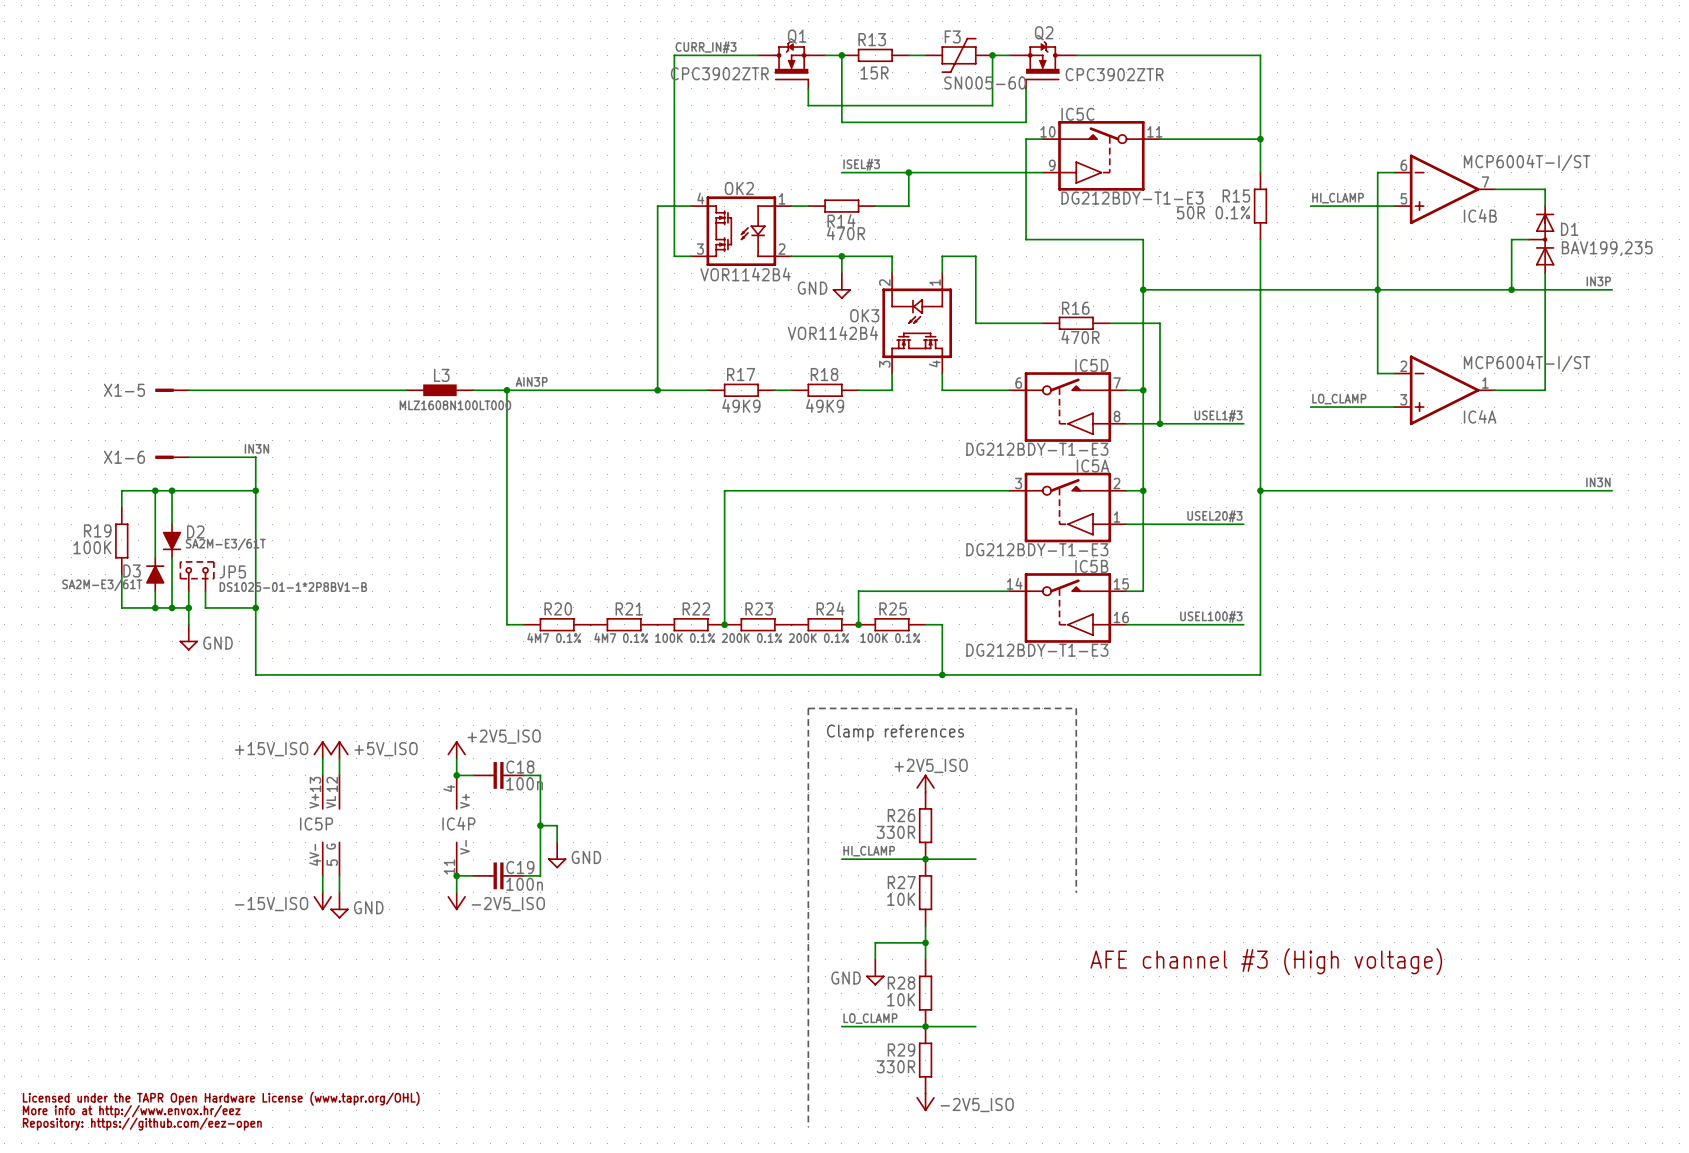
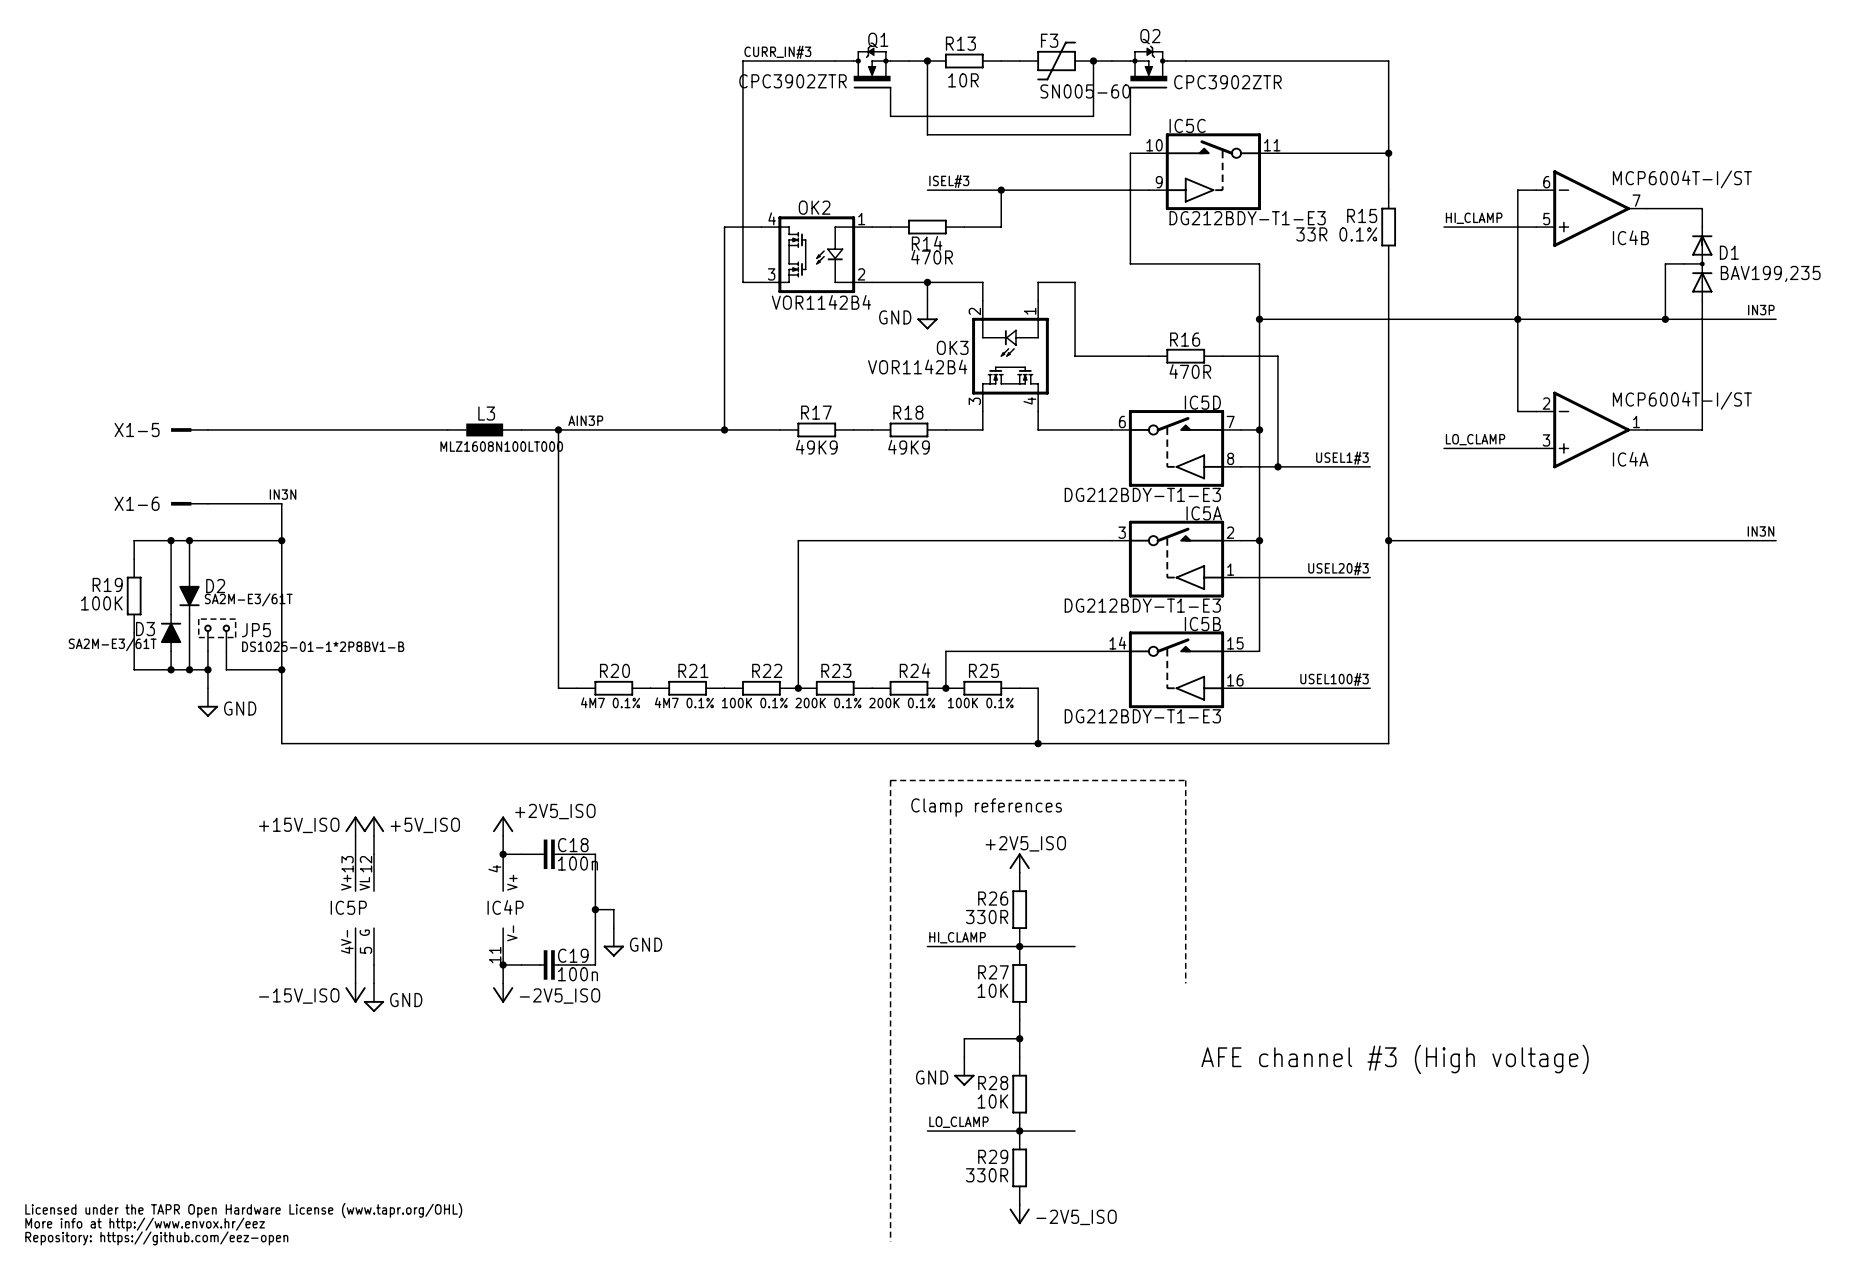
R13 value: 15R (874, 72) -> 10R (963, 80)
R15 value: 50R 0.1% (1213, 212) -> 33R 0.1% (1336, 234)

